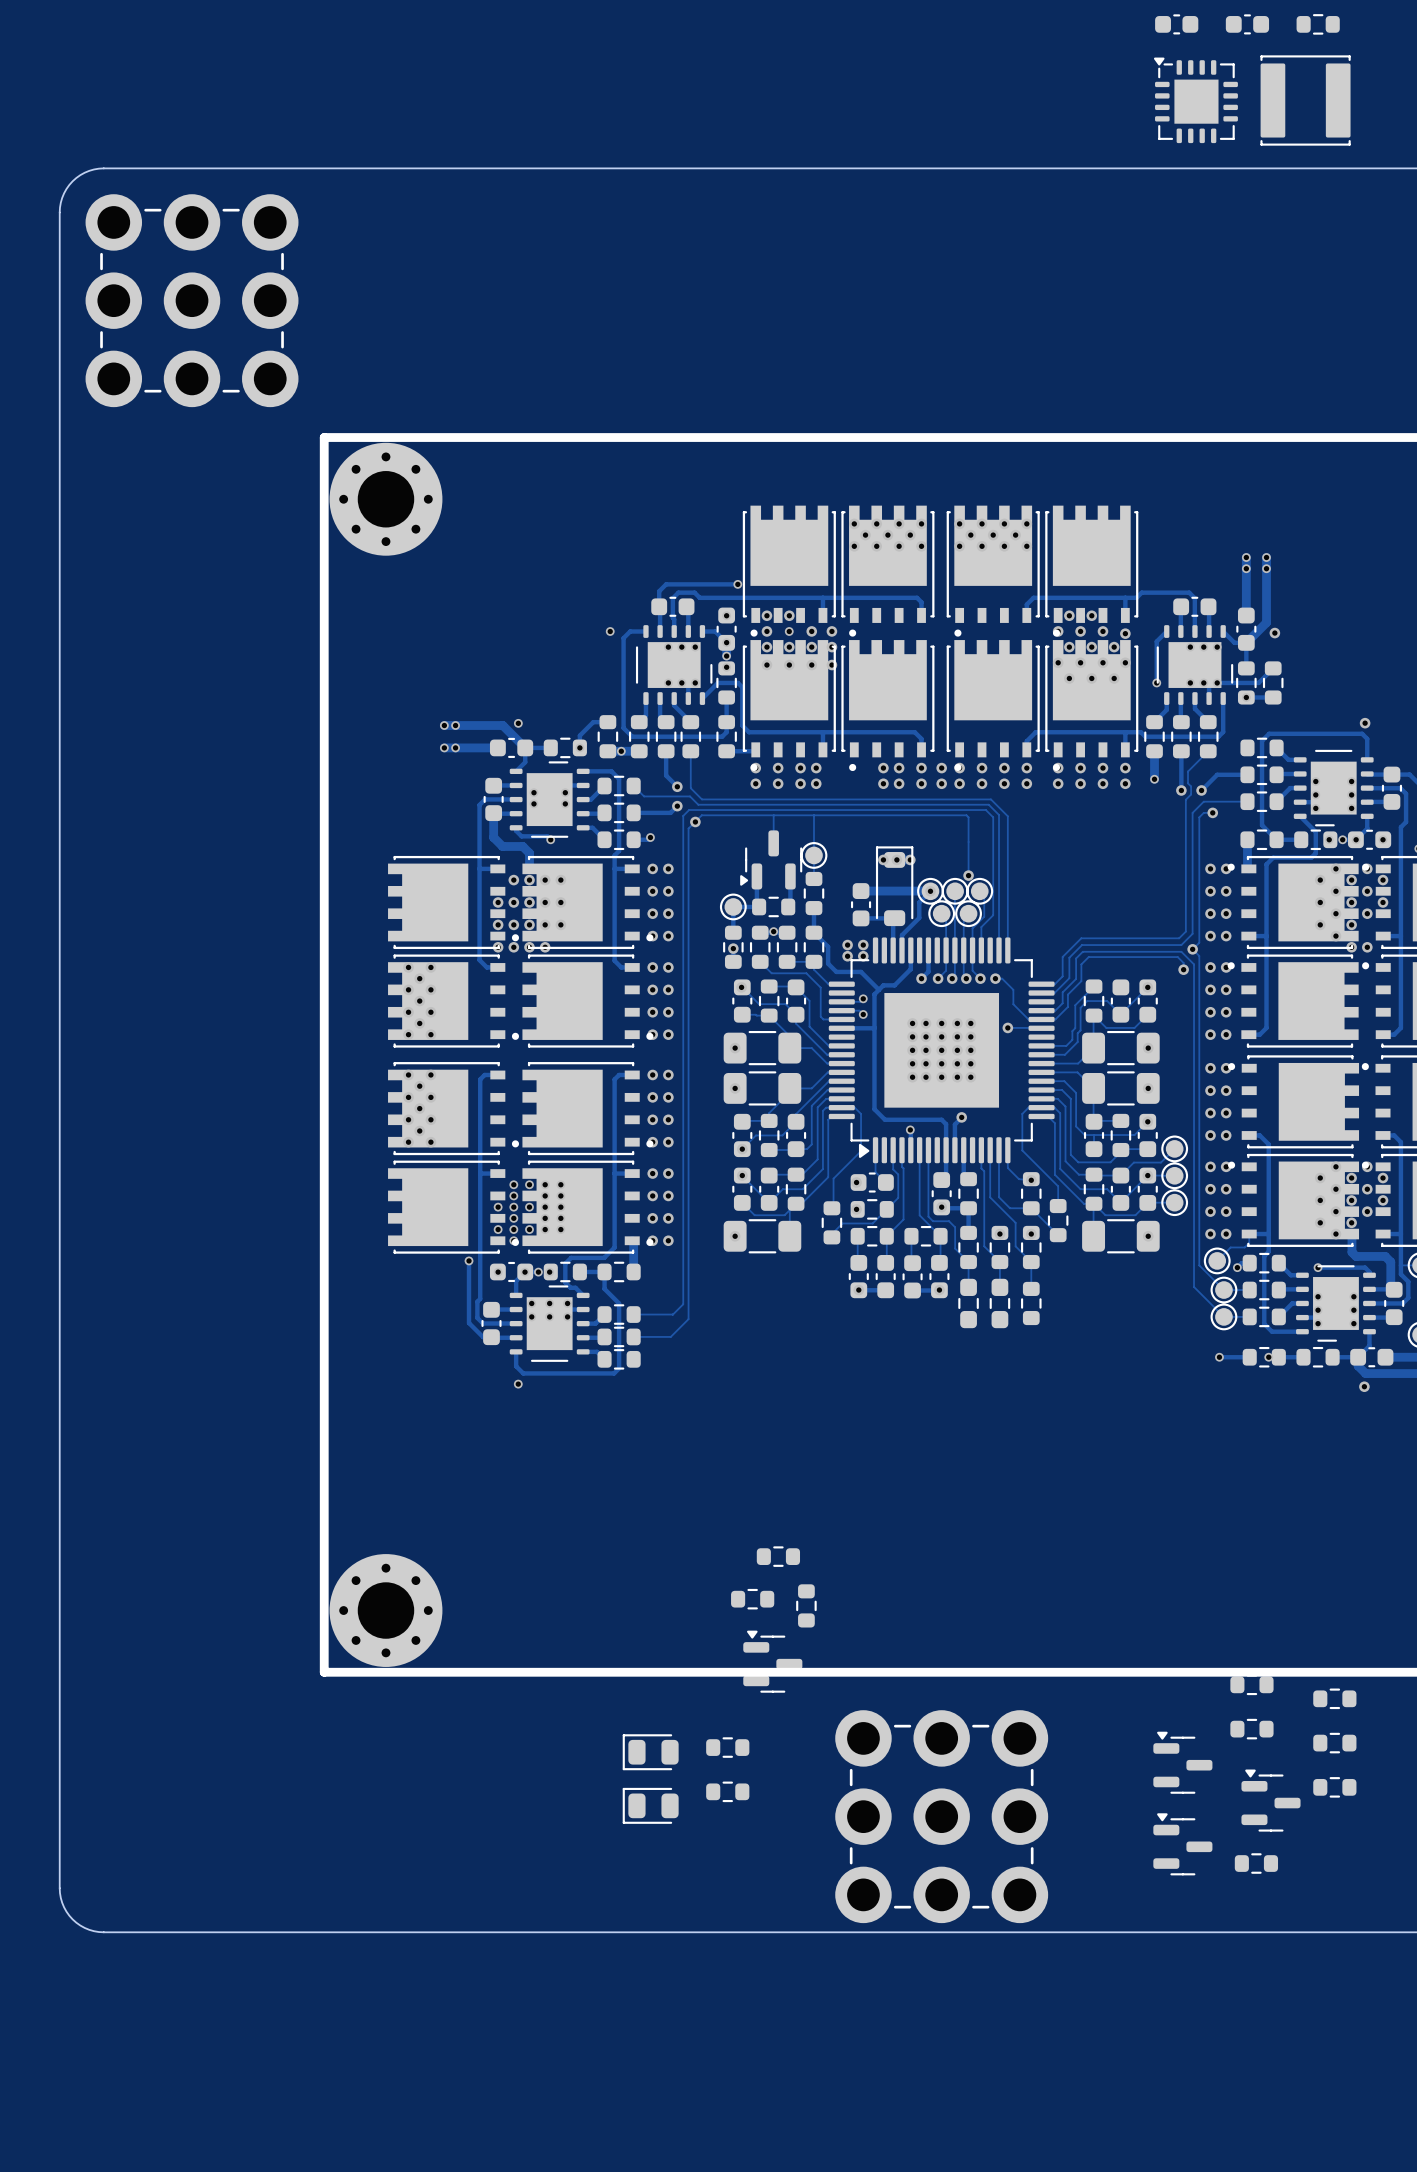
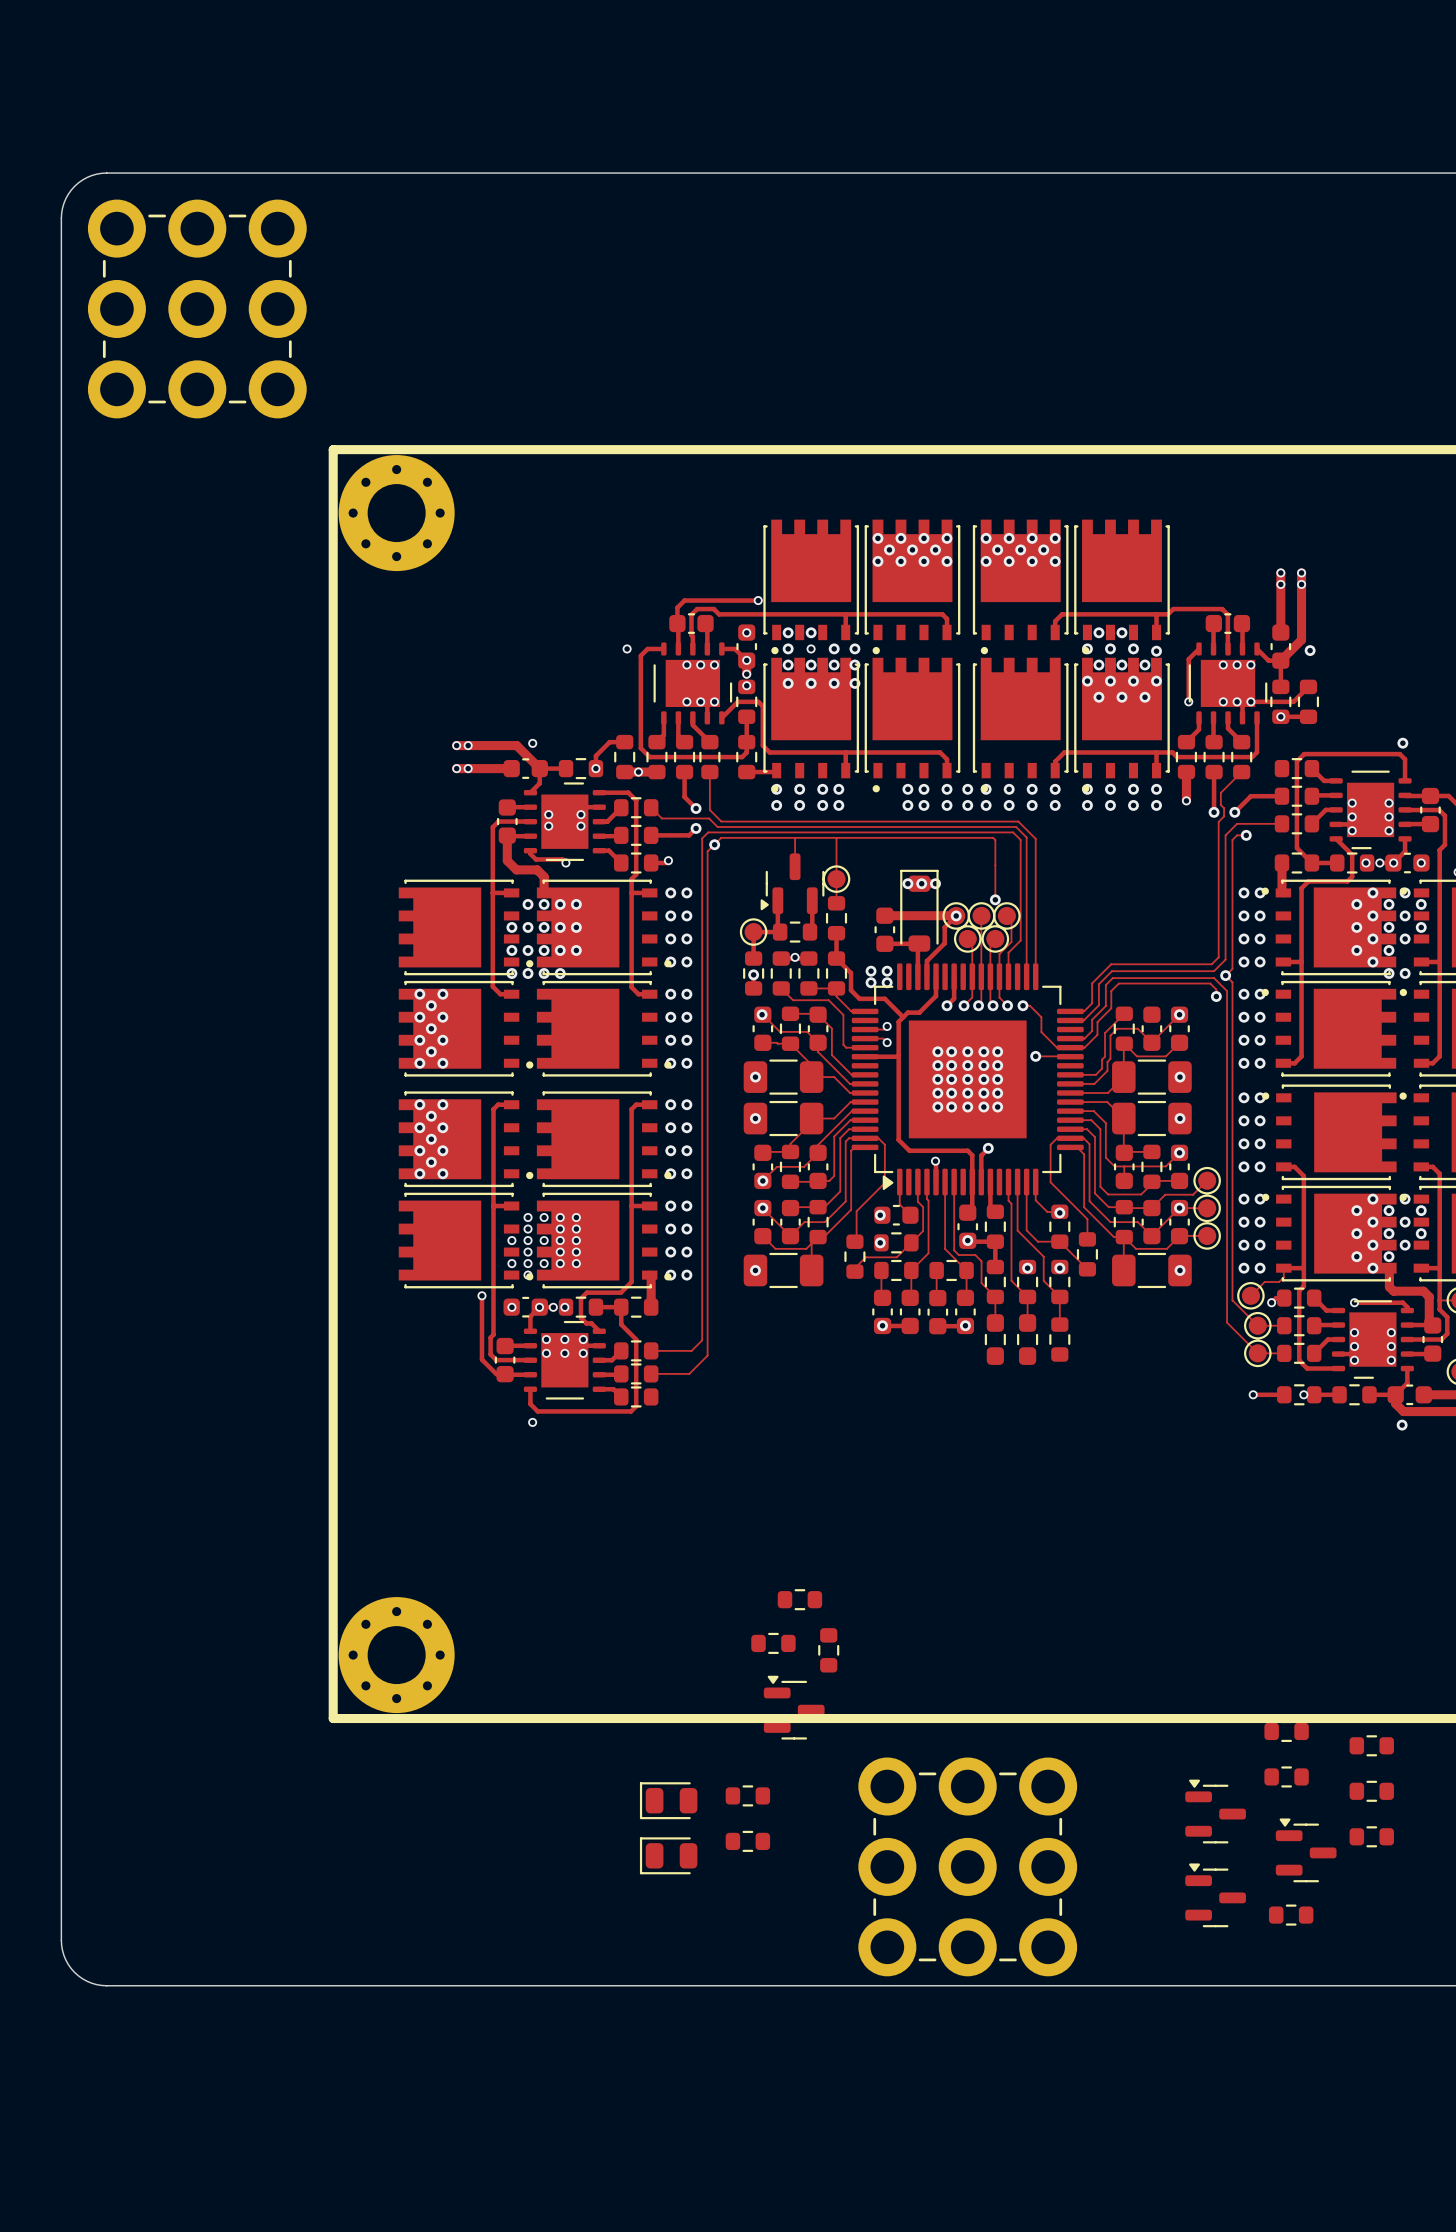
part: (1176, 24) -> none
part: (1247, 24) -> none
part: (1318, 24) -> none
part: (1195, 100) -> none
part: (1305, 100) -> none

